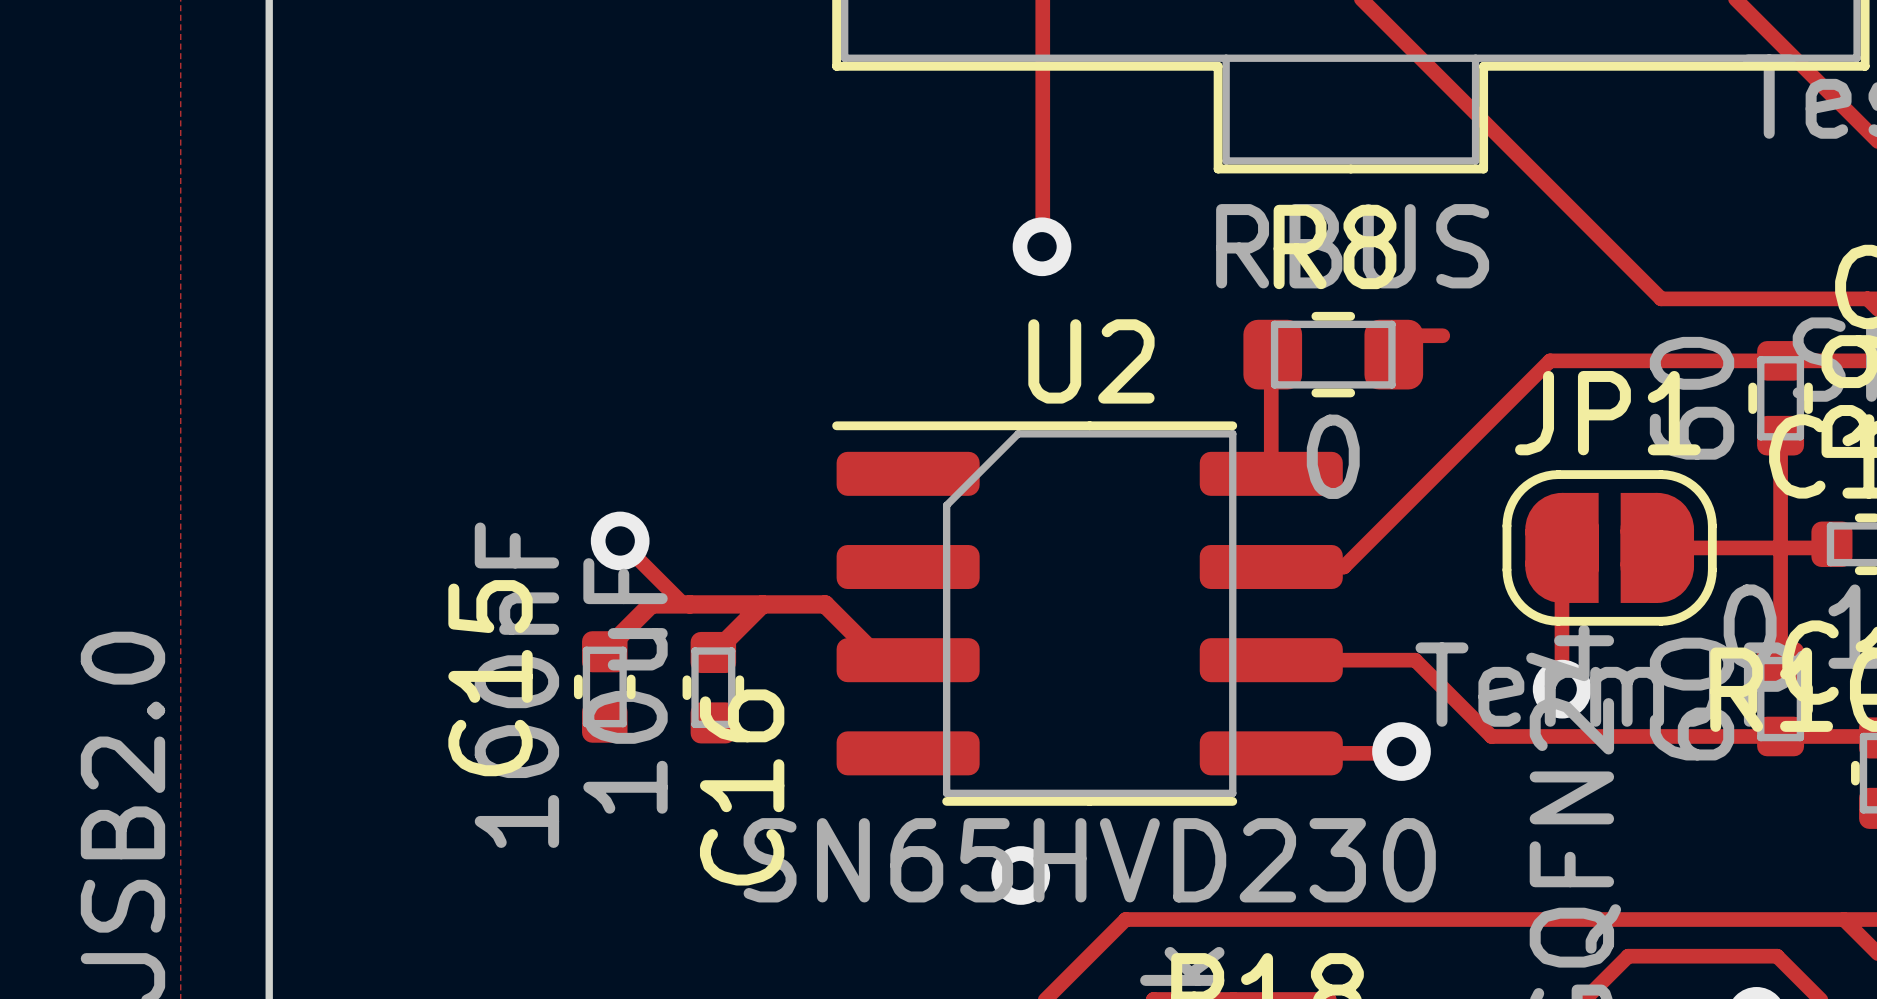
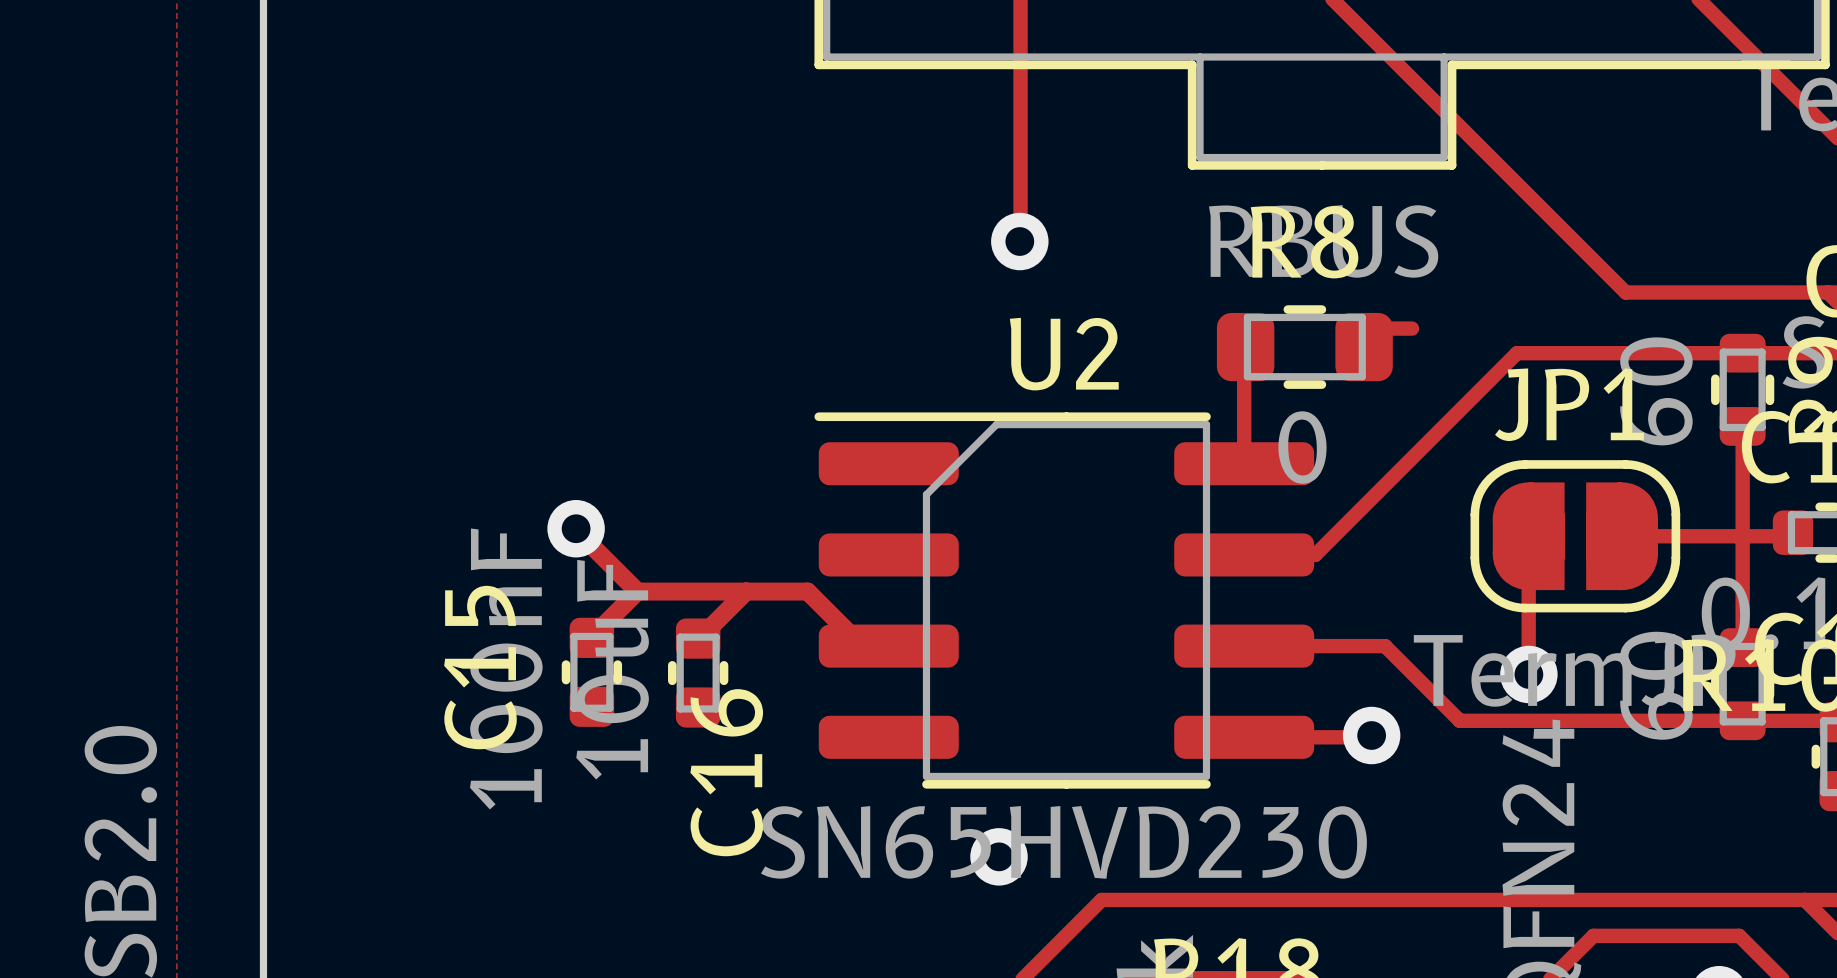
track: (620, 540) (683, 604) (689, 604) -> none
via position: (620, 540) -> (576, 528)
track: none -> (576, 530) (637, 591)

